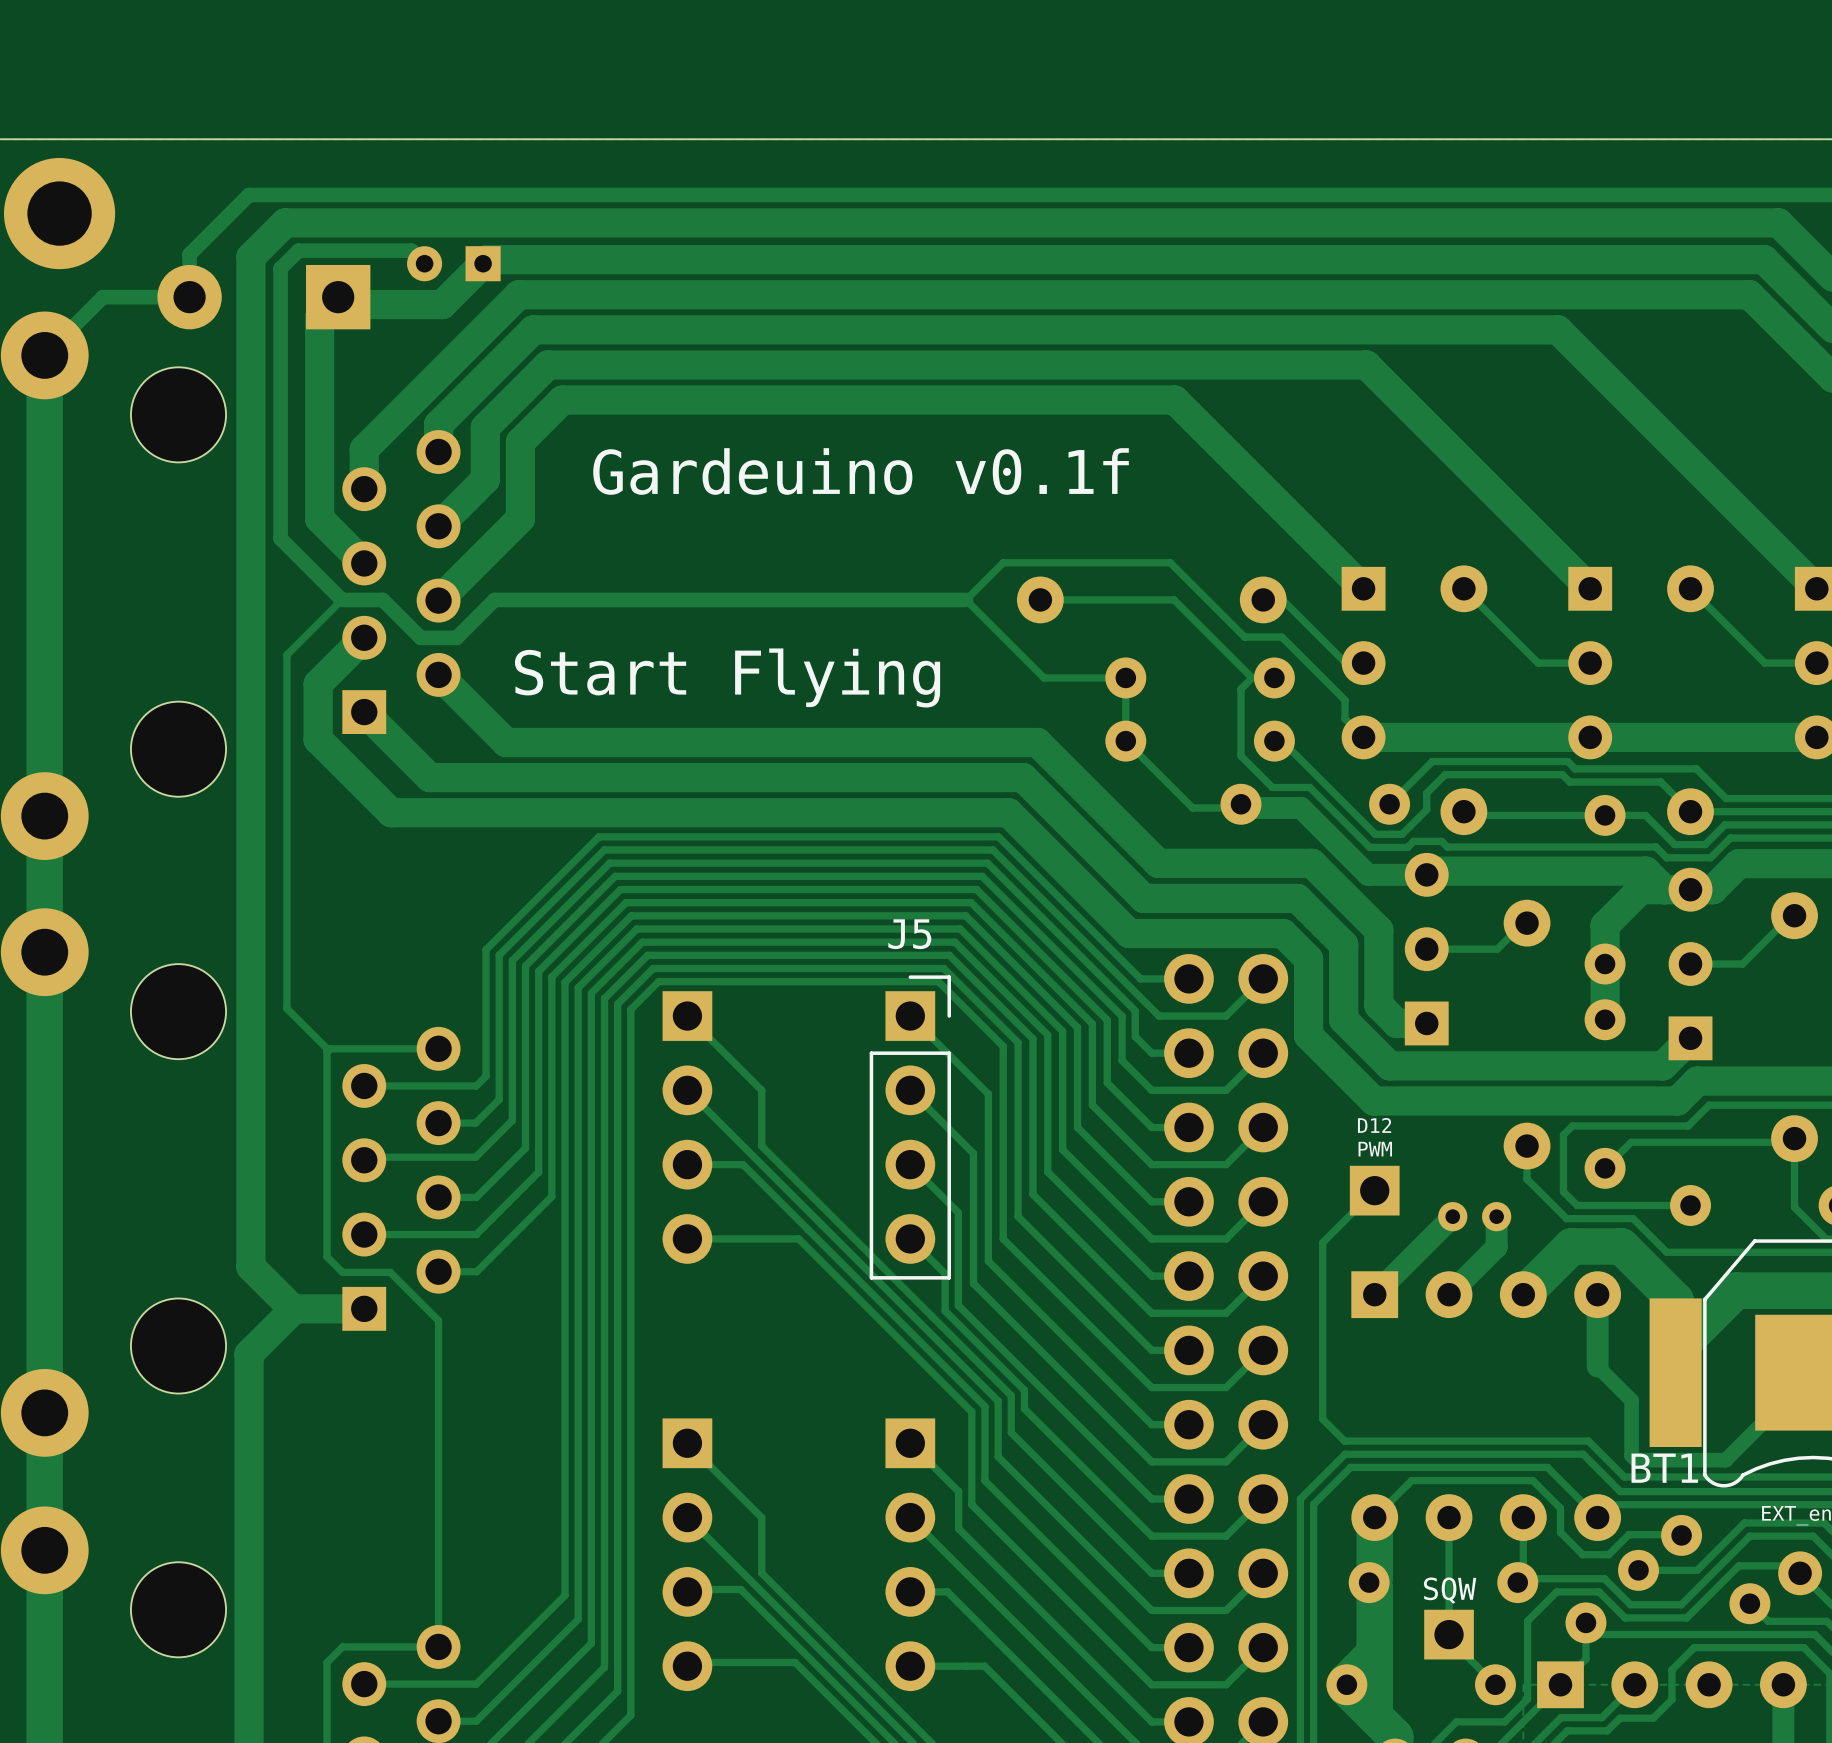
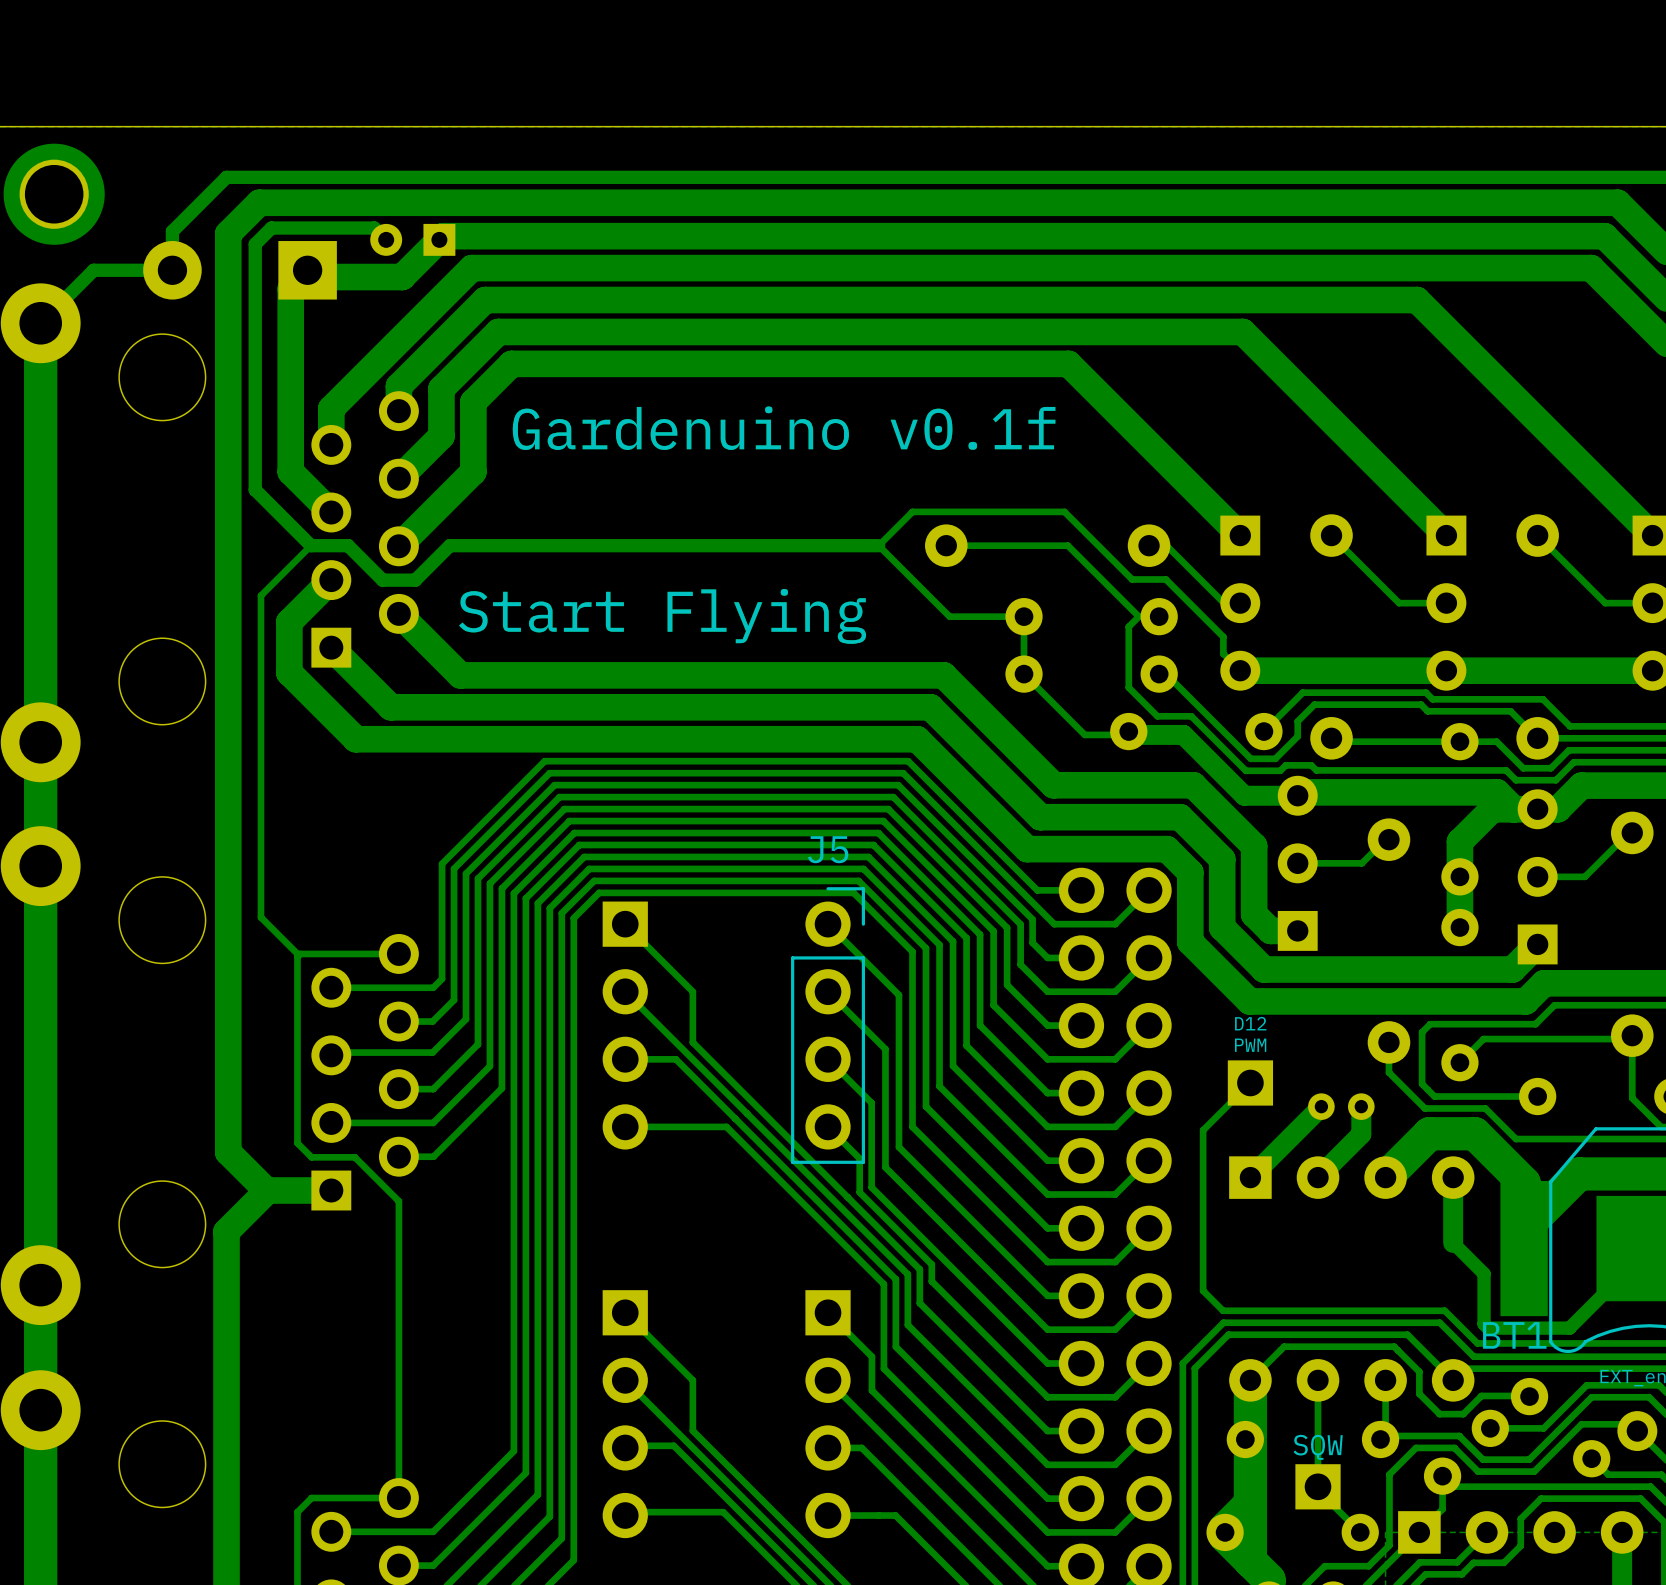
text: Gardeuino v0.1f (861, 471) -> none
text: none -> Gardenuino v0.1f (784, 428)
J5 footprint: [869, 975, 952, 1280] -> [791, 887, 866, 1164]

